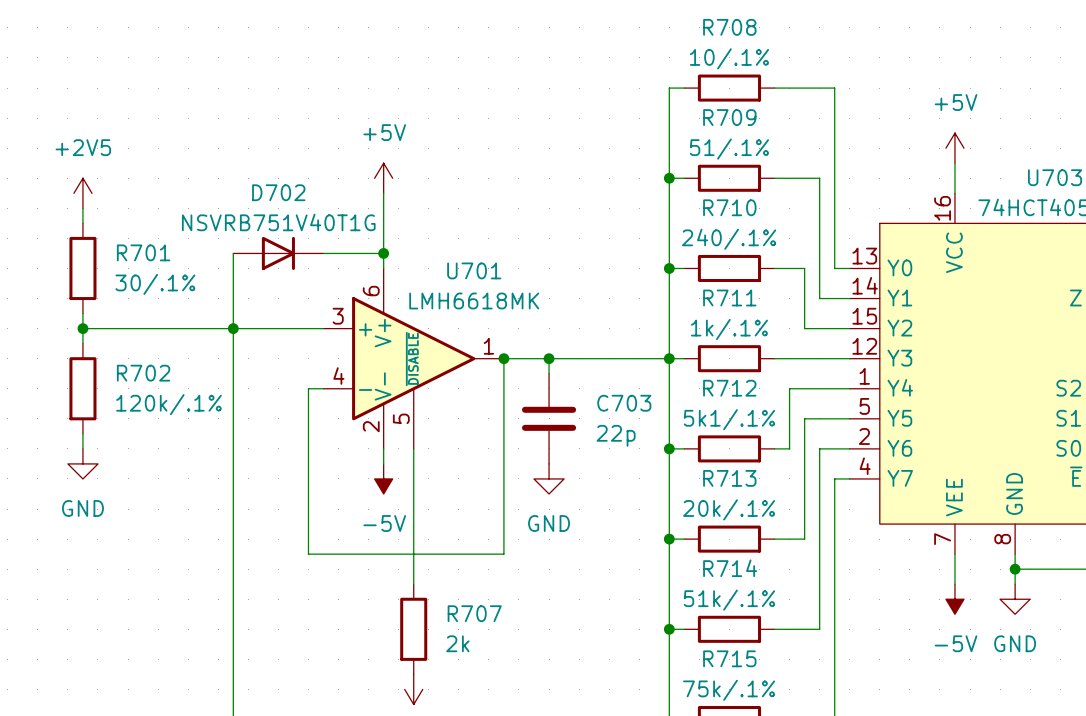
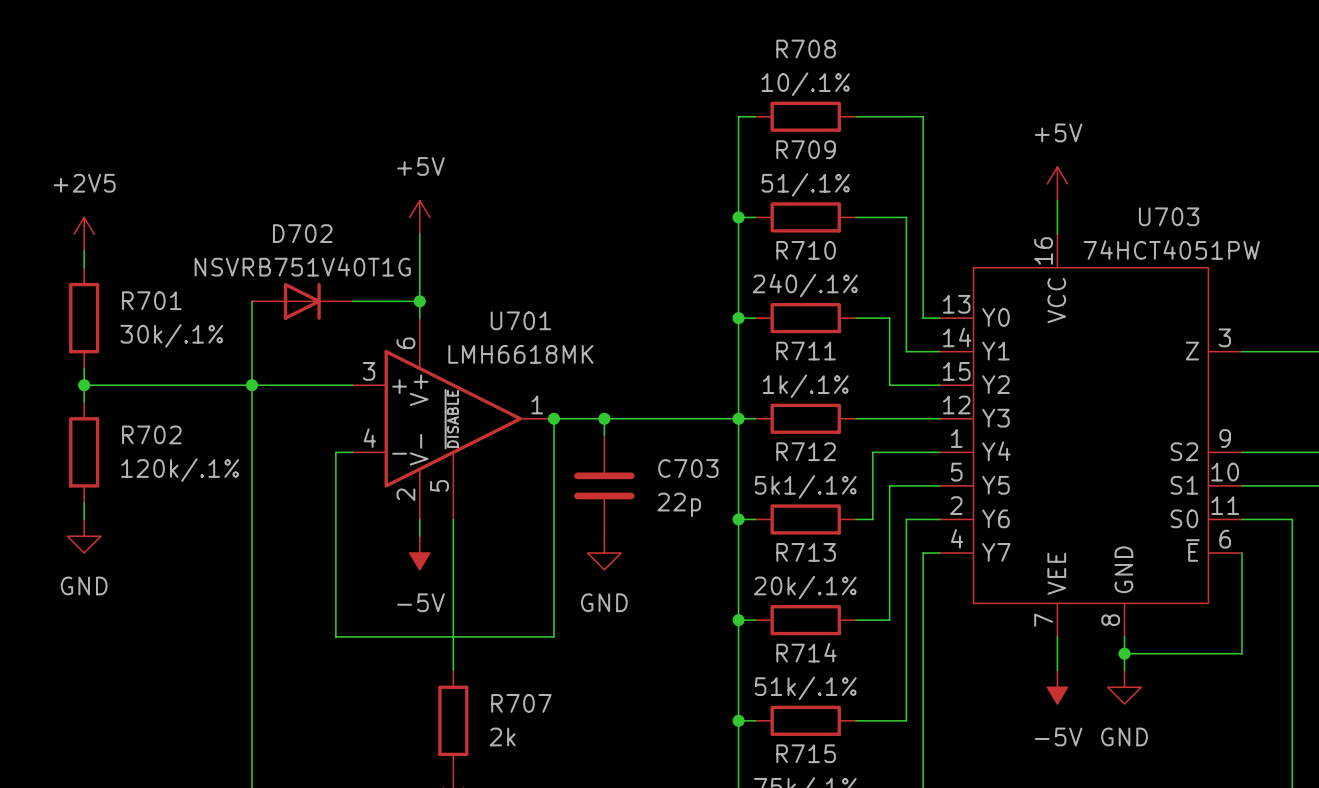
R701 value: 30/.1% (155, 284) -> 30k/.1% (171, 335)

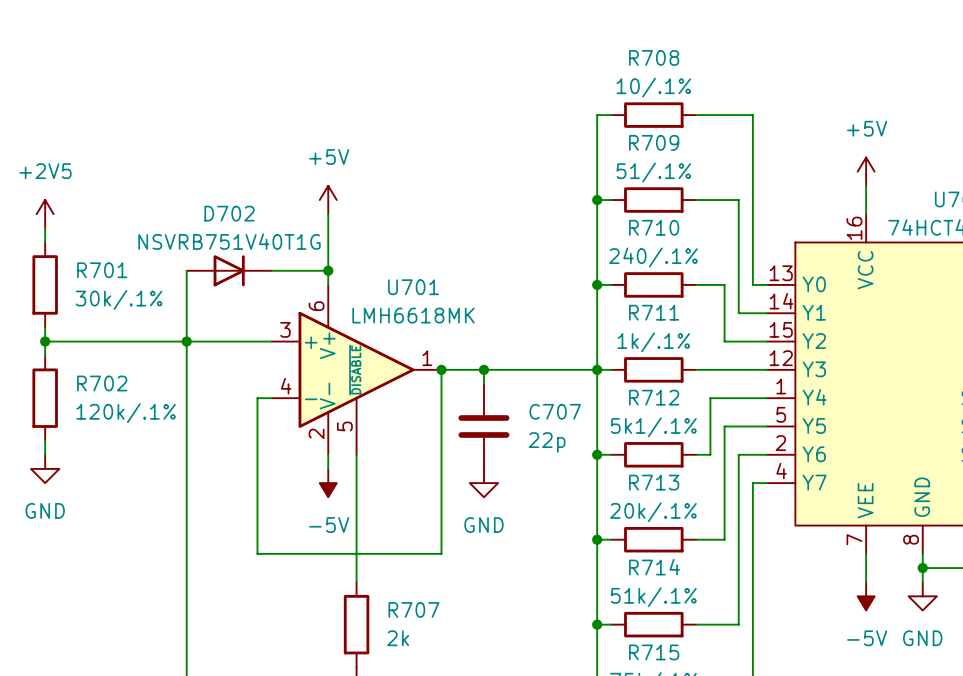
C703 name: C703 (688, 468) -> C707 (555, 411)

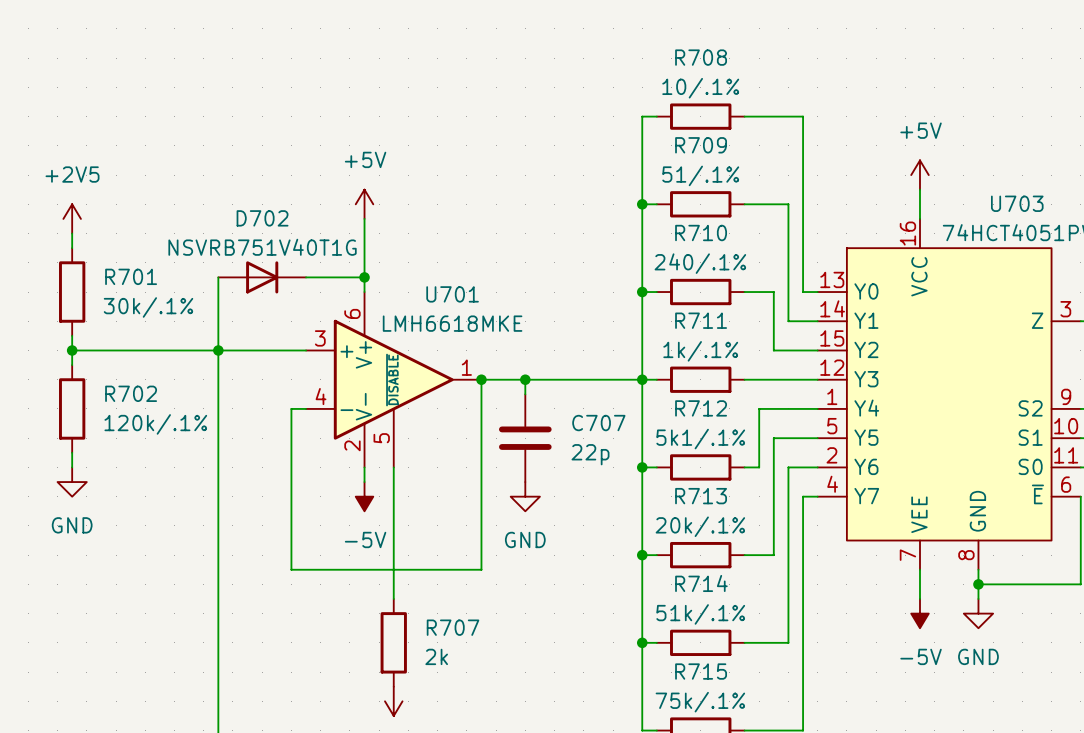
U701 value: LMH6618MK (413, 315) -> LMH6618MKE (452, 323)

